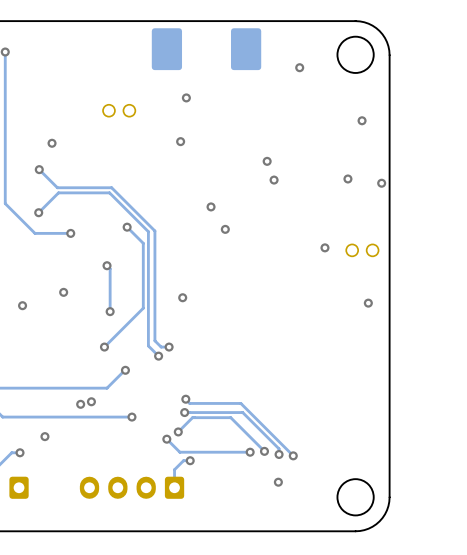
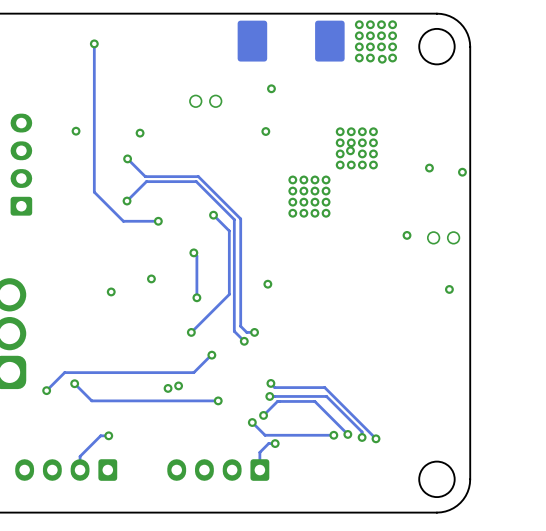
via: none -> (359, 24)
via: none -> (370, 24)
via: none -> (381, 24)
via: none -> (392, 24)
via: none -> (359, 35)
via: none -> (370, 35)
via: none -> (381, 35)
via: none -> (392, 35)
via: none -> (359, 46)
via: none -> (370, 46)
via: none -> (381, 46)
via: none -> (392, 46)
via: none -> (359, 58)
via: none -> (370, 58)
via: none -> (392, 58)
via: (362, 120) -> none
via: none -> (340, 131)
via: none -> (351, 131)
via: none -> (362, 131)
via: none -> (373, 131)
via: none -> (340, 142)
via: none -> (351, 142)
via: none -> (362, 142)
via: none -> (373, 142)
via: none -> (340, 153)
via: none -> (362, 153)
via: none -> (373, 153)
via: none -> (340, 165)
via: none -> (351, 165)
via: none -> (362, 165)
via: none -> (373, 165)
via: (274, 180) -> none
via: none -> (292, 179)
via: none -> (303, 179)
via: none -> (314, 179)
via: none -> (326, 179)
via: none -> (292, 191)
via: none -> (303, 191)
via: none -> (314, 191)
via: none -> (326, 191)
via: (211, 206) -> none
via: none -> (292, 202)
via: none -> (303, 202)
via: none -> (314, 202)
via: none -> (326, 202)
via: none -> (292, 213)
via: none -> (303, 213)
via: none -> (314, 213)
via: none -> (326, 213)
via: (225, 229) -> none
via: (44, 436) -> none
via: (278, 482) -> none

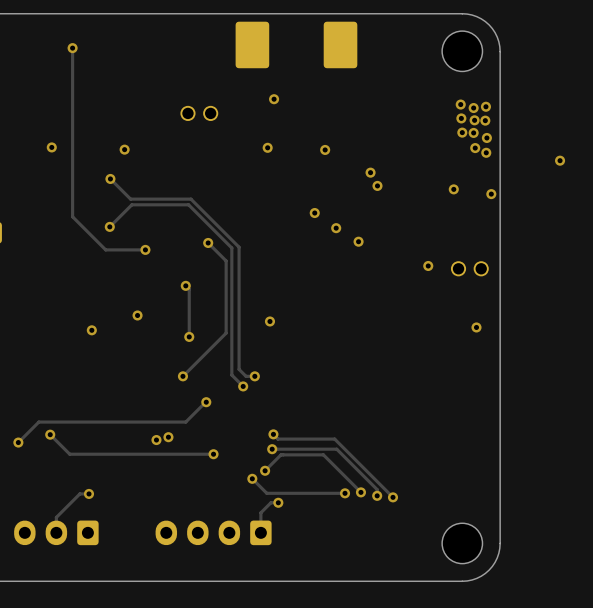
via: (359, 24) -> none
via: (370, 24) -> none
via: (381, 24) -> none
via: (392, 24) -> none
via: (359, 35) -> none
via: (370, 35) -> none
via: (381, 35) -> none
via: (392, 35) -> none
via: (359, 46) -> none
via: (370, 46) -> none
via: (381, 46) -> none
via: (392, 46) -> none
via: (359, 58) -> none
via: (370, 58) -> none
via: (392, 58) -> none
via: (382, 59) -> none
via: none -> (460, 104)
via: none -> (485, 106)
via: none -> (473, 108)
via: none -> (461, 118)
via: none -> (474, 120)
via: none -> (485, 120)
via: none -> (462, 132)
via: none -> (473, 132)
via: none -> (486, 137)
via: (340, 131) -> none
via: (351, 131) -> none
via: (362, 131) -> none
via: (373, 131) -> none
via: none -> (475, 148)
via: none -> (325, 149)
via: none -> (486, 152)
via: (340, 142) -> none
via: (351, 142) -> none
via: (362, 142) -> none
via: (373, 142) -> none
via: none -> (560, 160)
via: (350, 150) -> none
via: (340, 153) -> none
via: none -> (370, 172)
via: (362, 153) -> none
via: (373, 153) -> none
via: (340, 165) -> none
via: (351, 165) -> none
via: (373, 165) -> none
via: (292, 179) -> none
via: (303, 179) -> none
via: (314, 179) -> none
via: (326, 179) -> none
via: none -> (314, 213)
via: (292, 191) -> none
via: (303, 191) -> none
via: (314, 191) -> none
via: (326, 191) -> none
via: (292, 202) -> none
via: (303, 202) -> none
via: (314, 202) -> none
via: (292, 213) -> none
via: (303, 213) -> none
via: (314, 213) -> none
via: (326, 213) -> none
via: none -> (358, 241)

